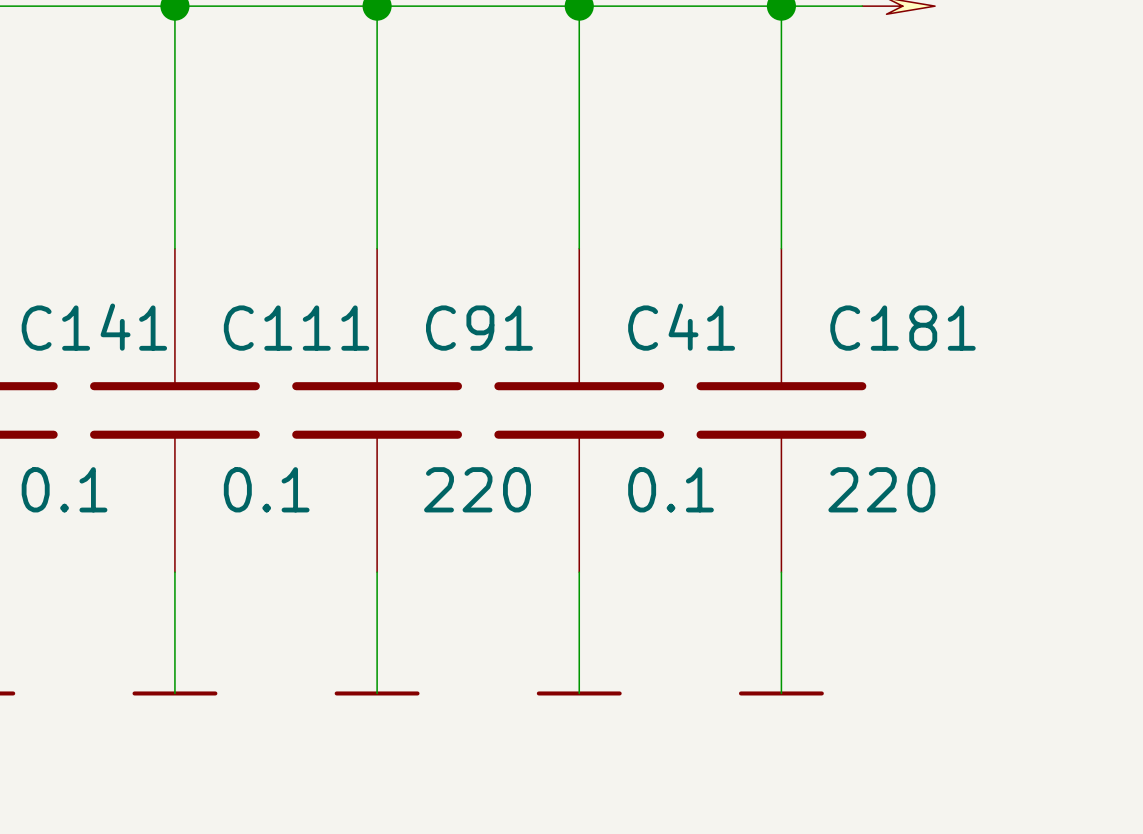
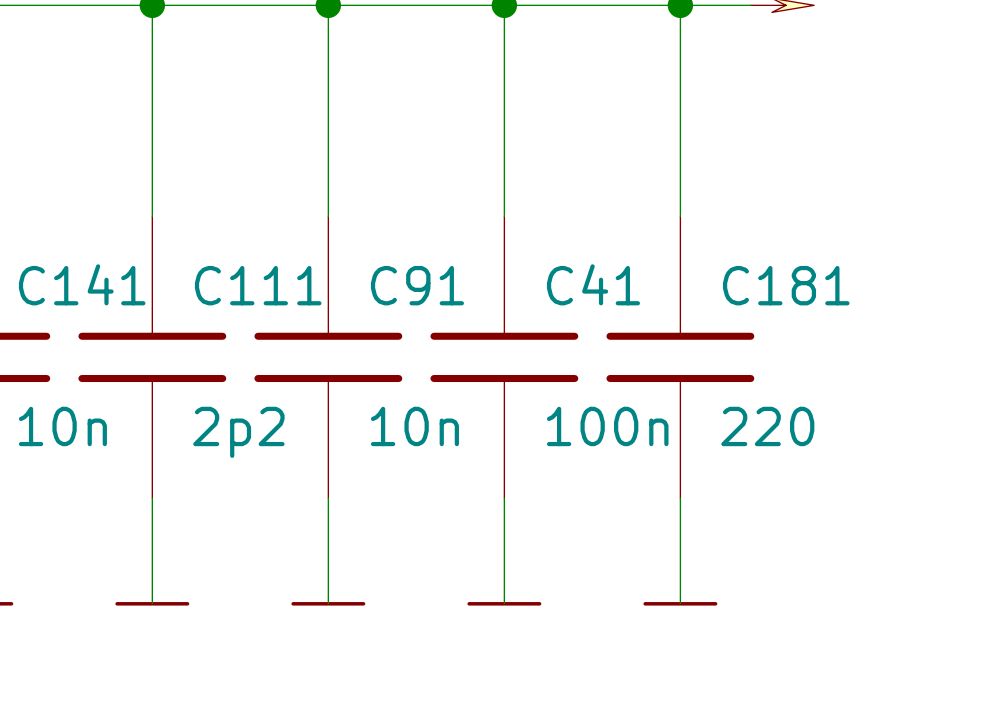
C141 value: 0.1 (64, 489) -> 10n (62, 426)
C111 value: 0.1 (266, 489) -> 2p2 (238, 432)
C91 value: 220 (477, 489) -> 10n (414, 426)
C41 value: 0.1 (671, 489) -> 100n (607, 426)

